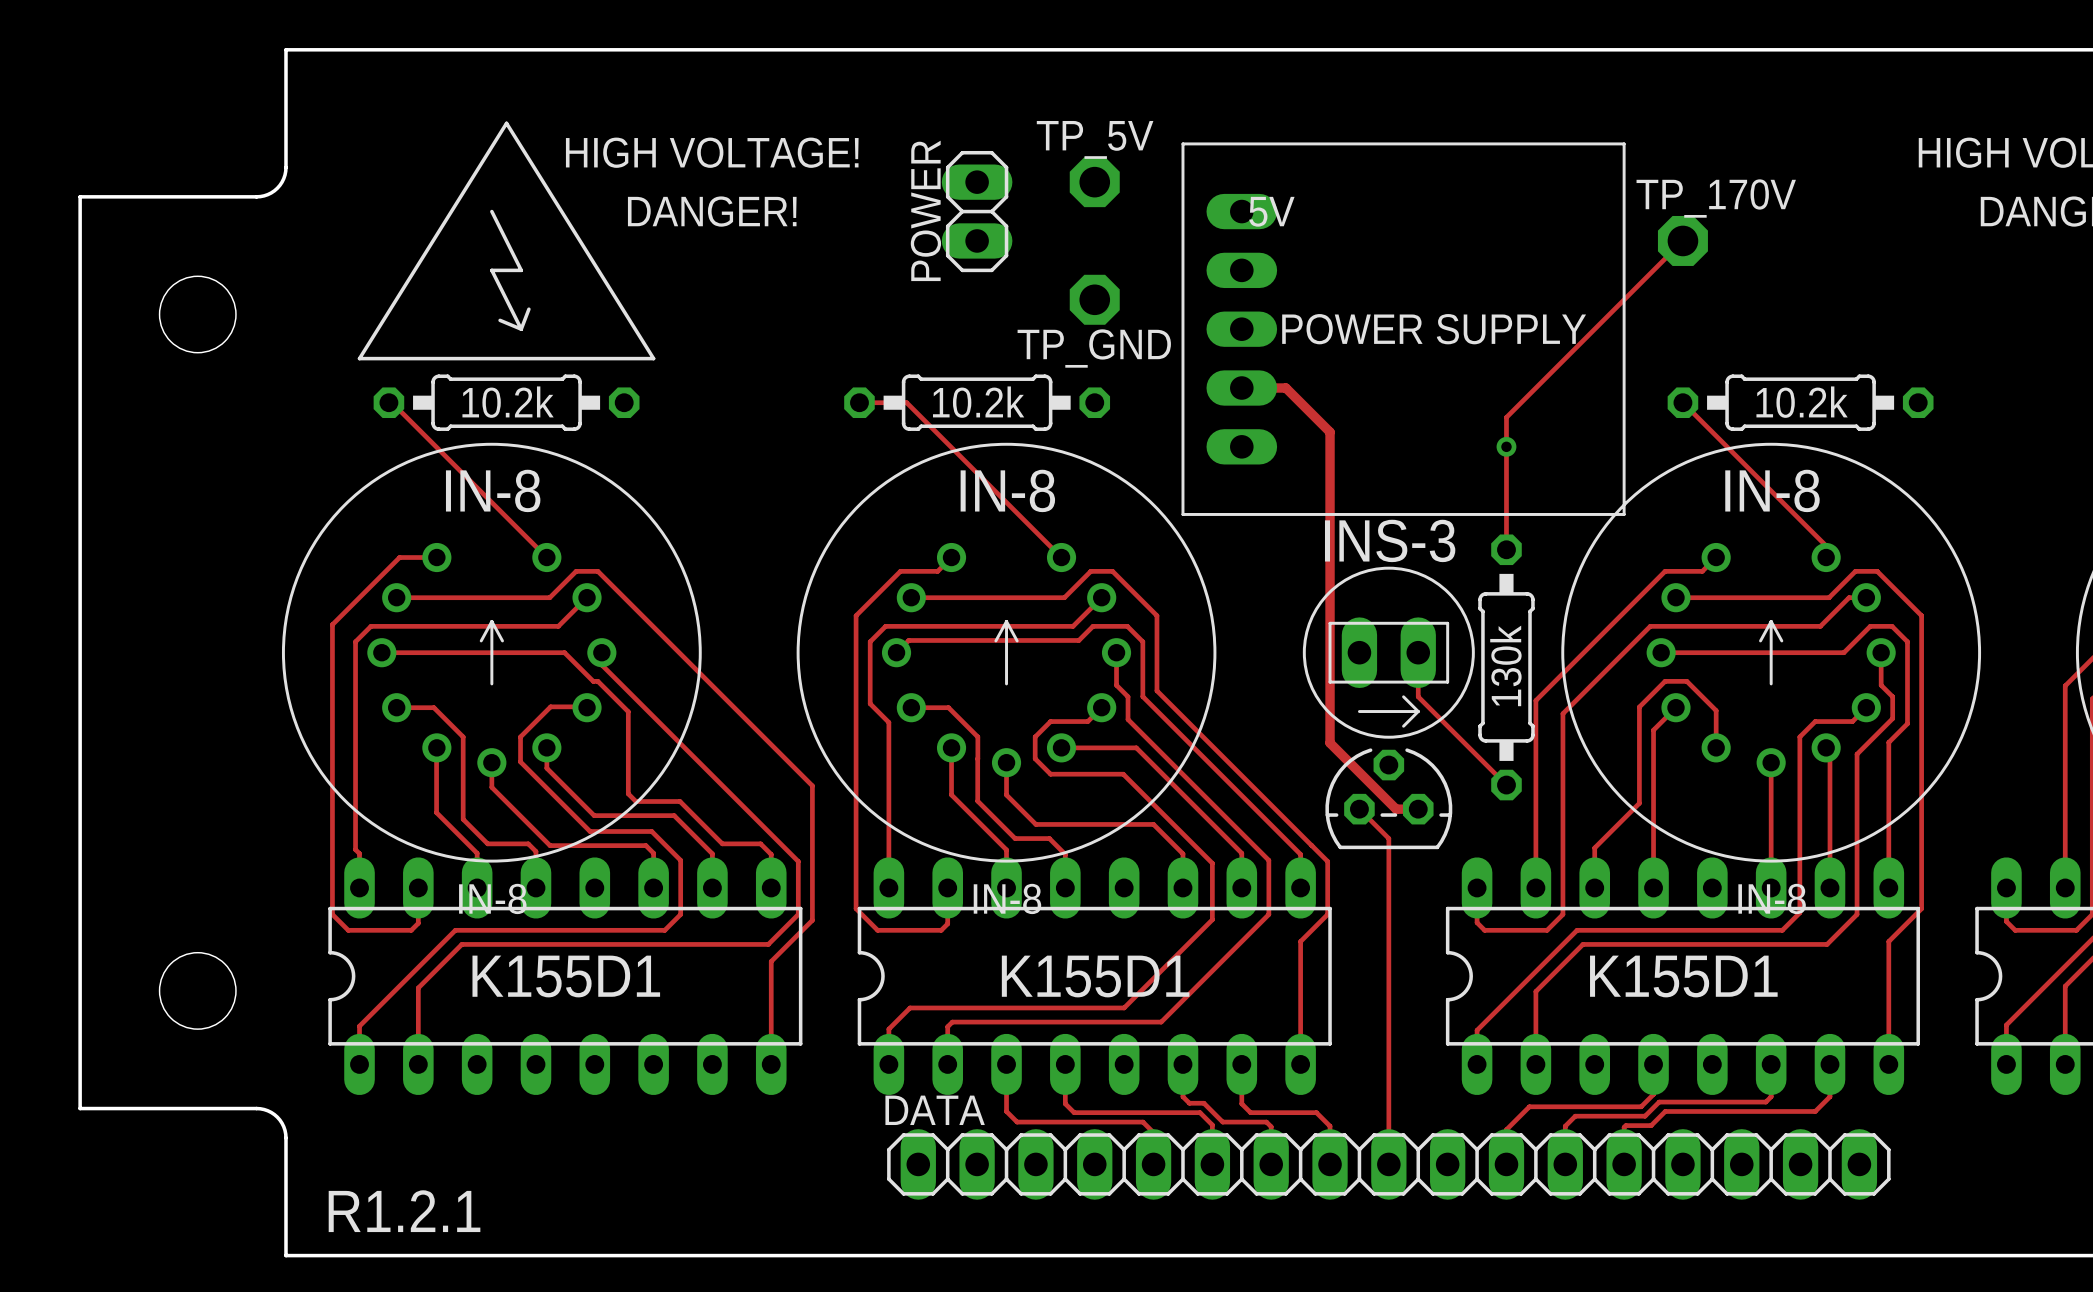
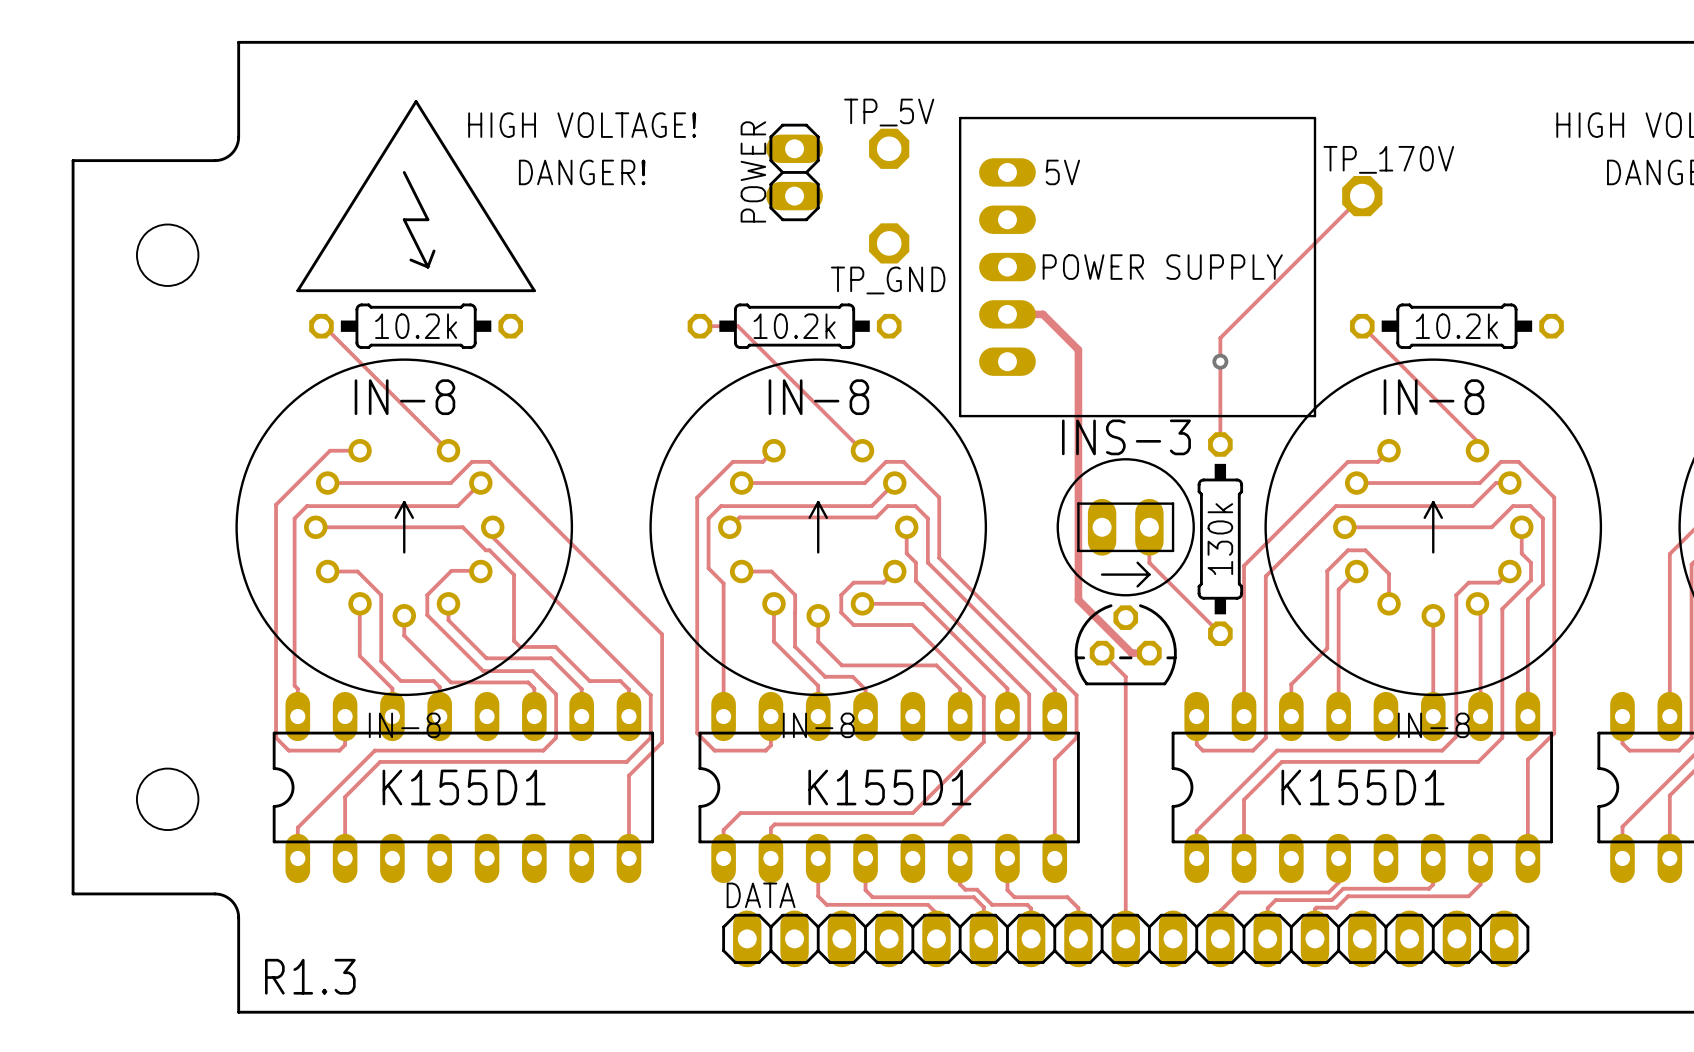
text position: 5V (1271, 211) -> 5V (1062, 172)
text: none -> R1.3 (310, 976)
text: R1.2.1 (404, 1211) -> none

